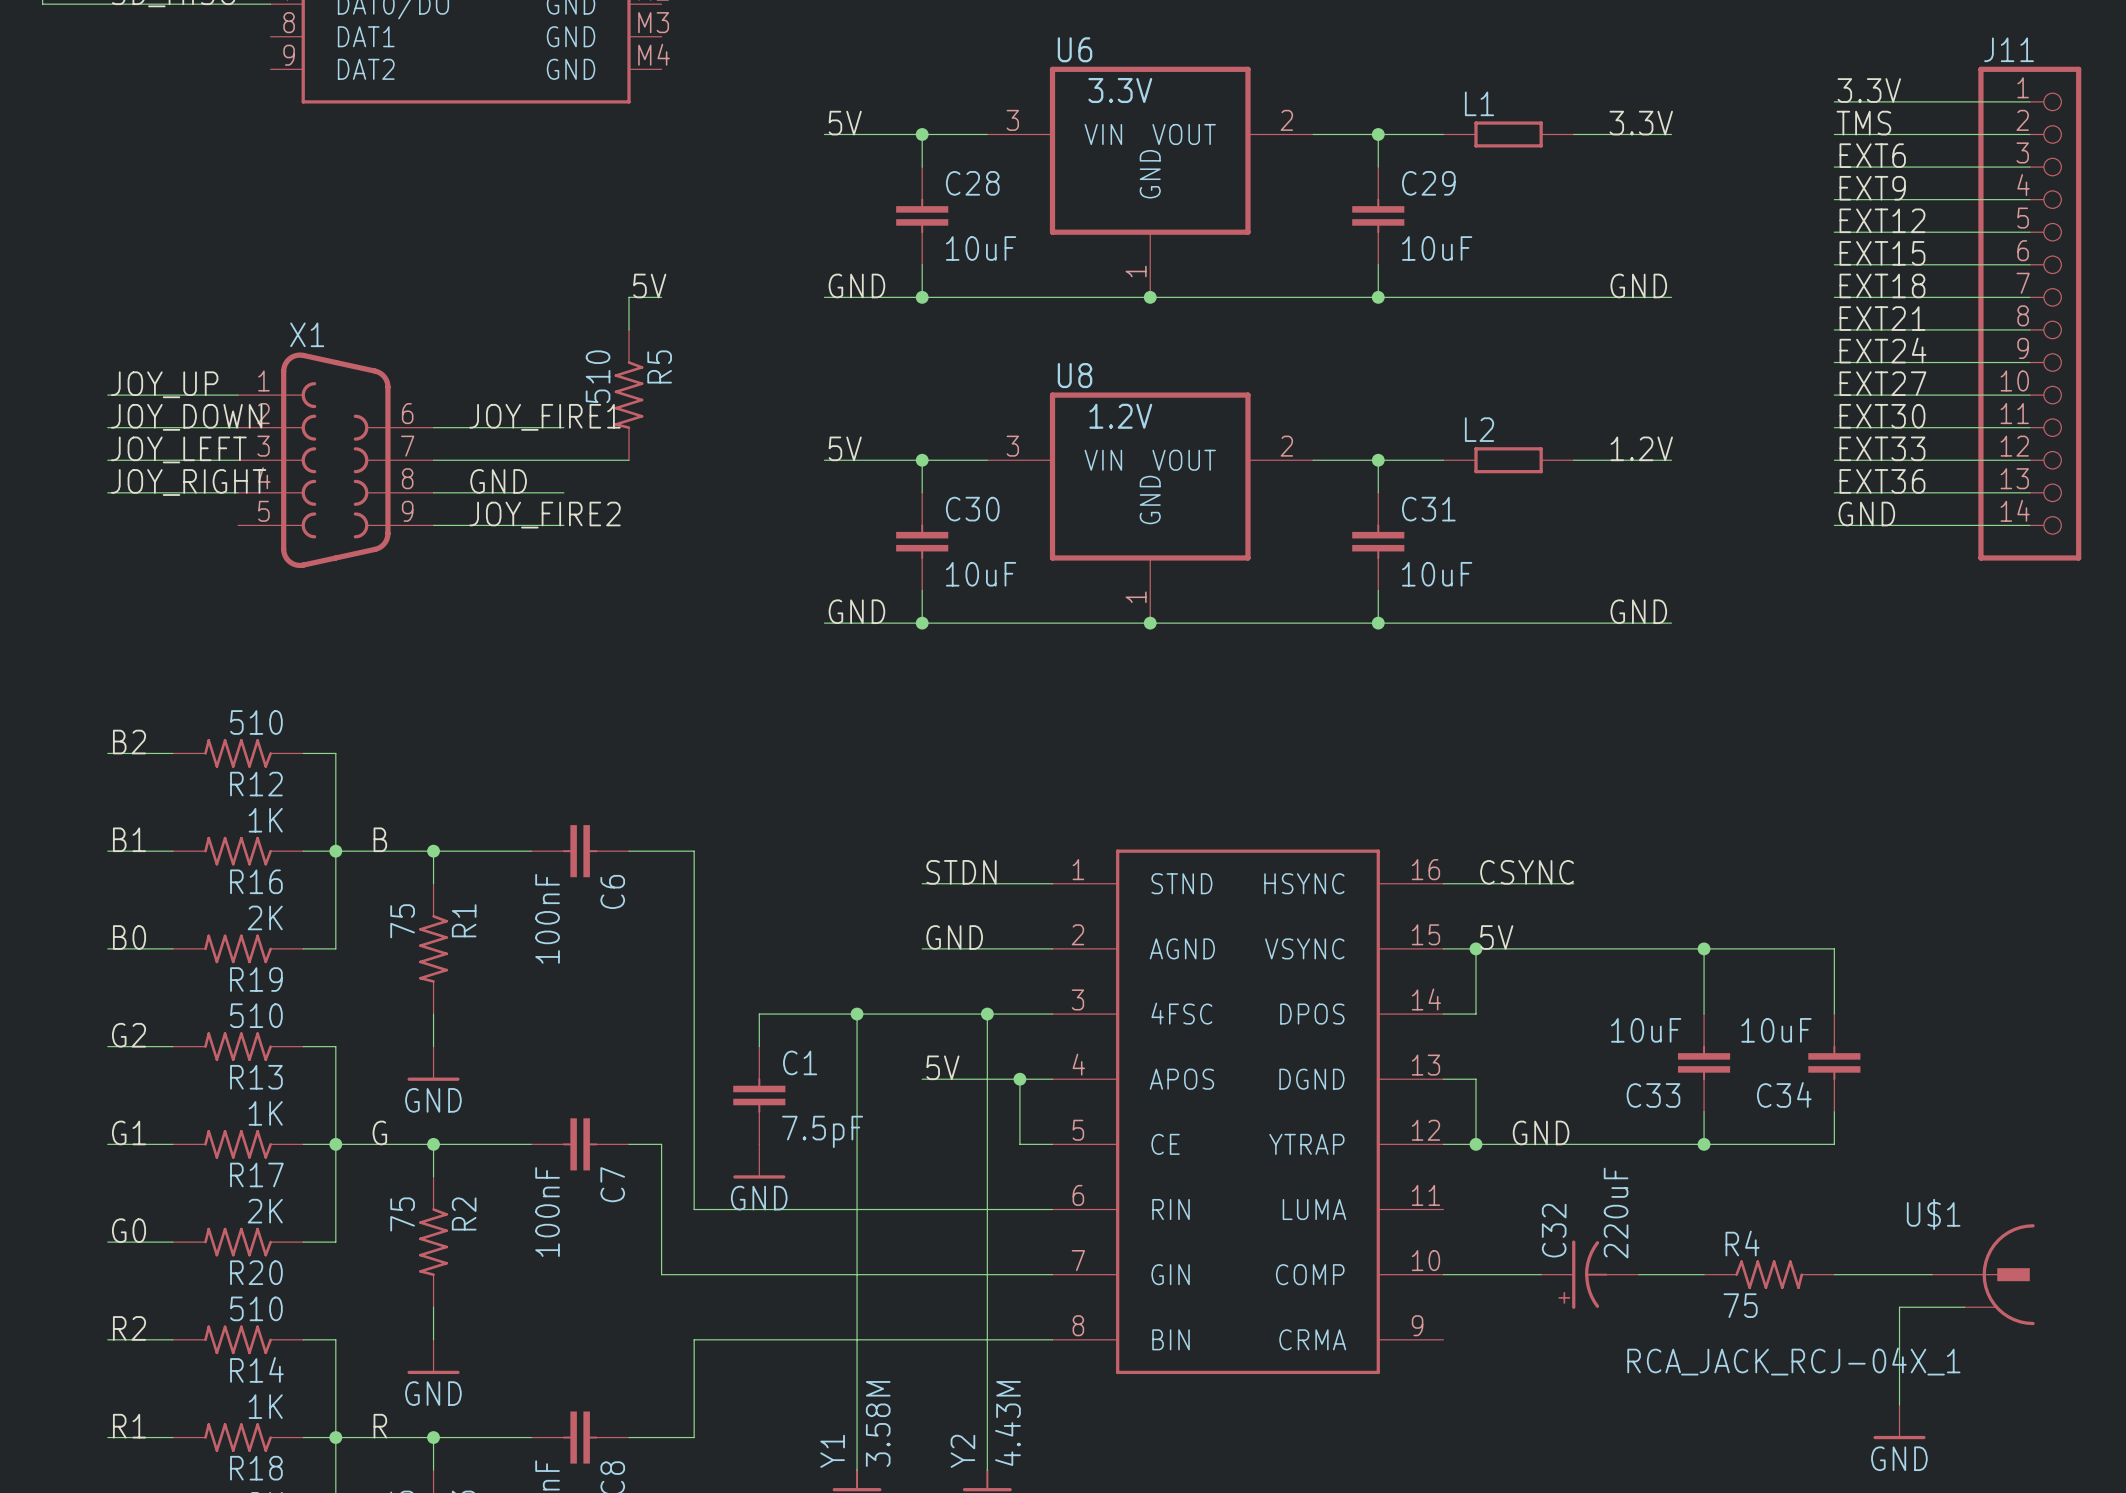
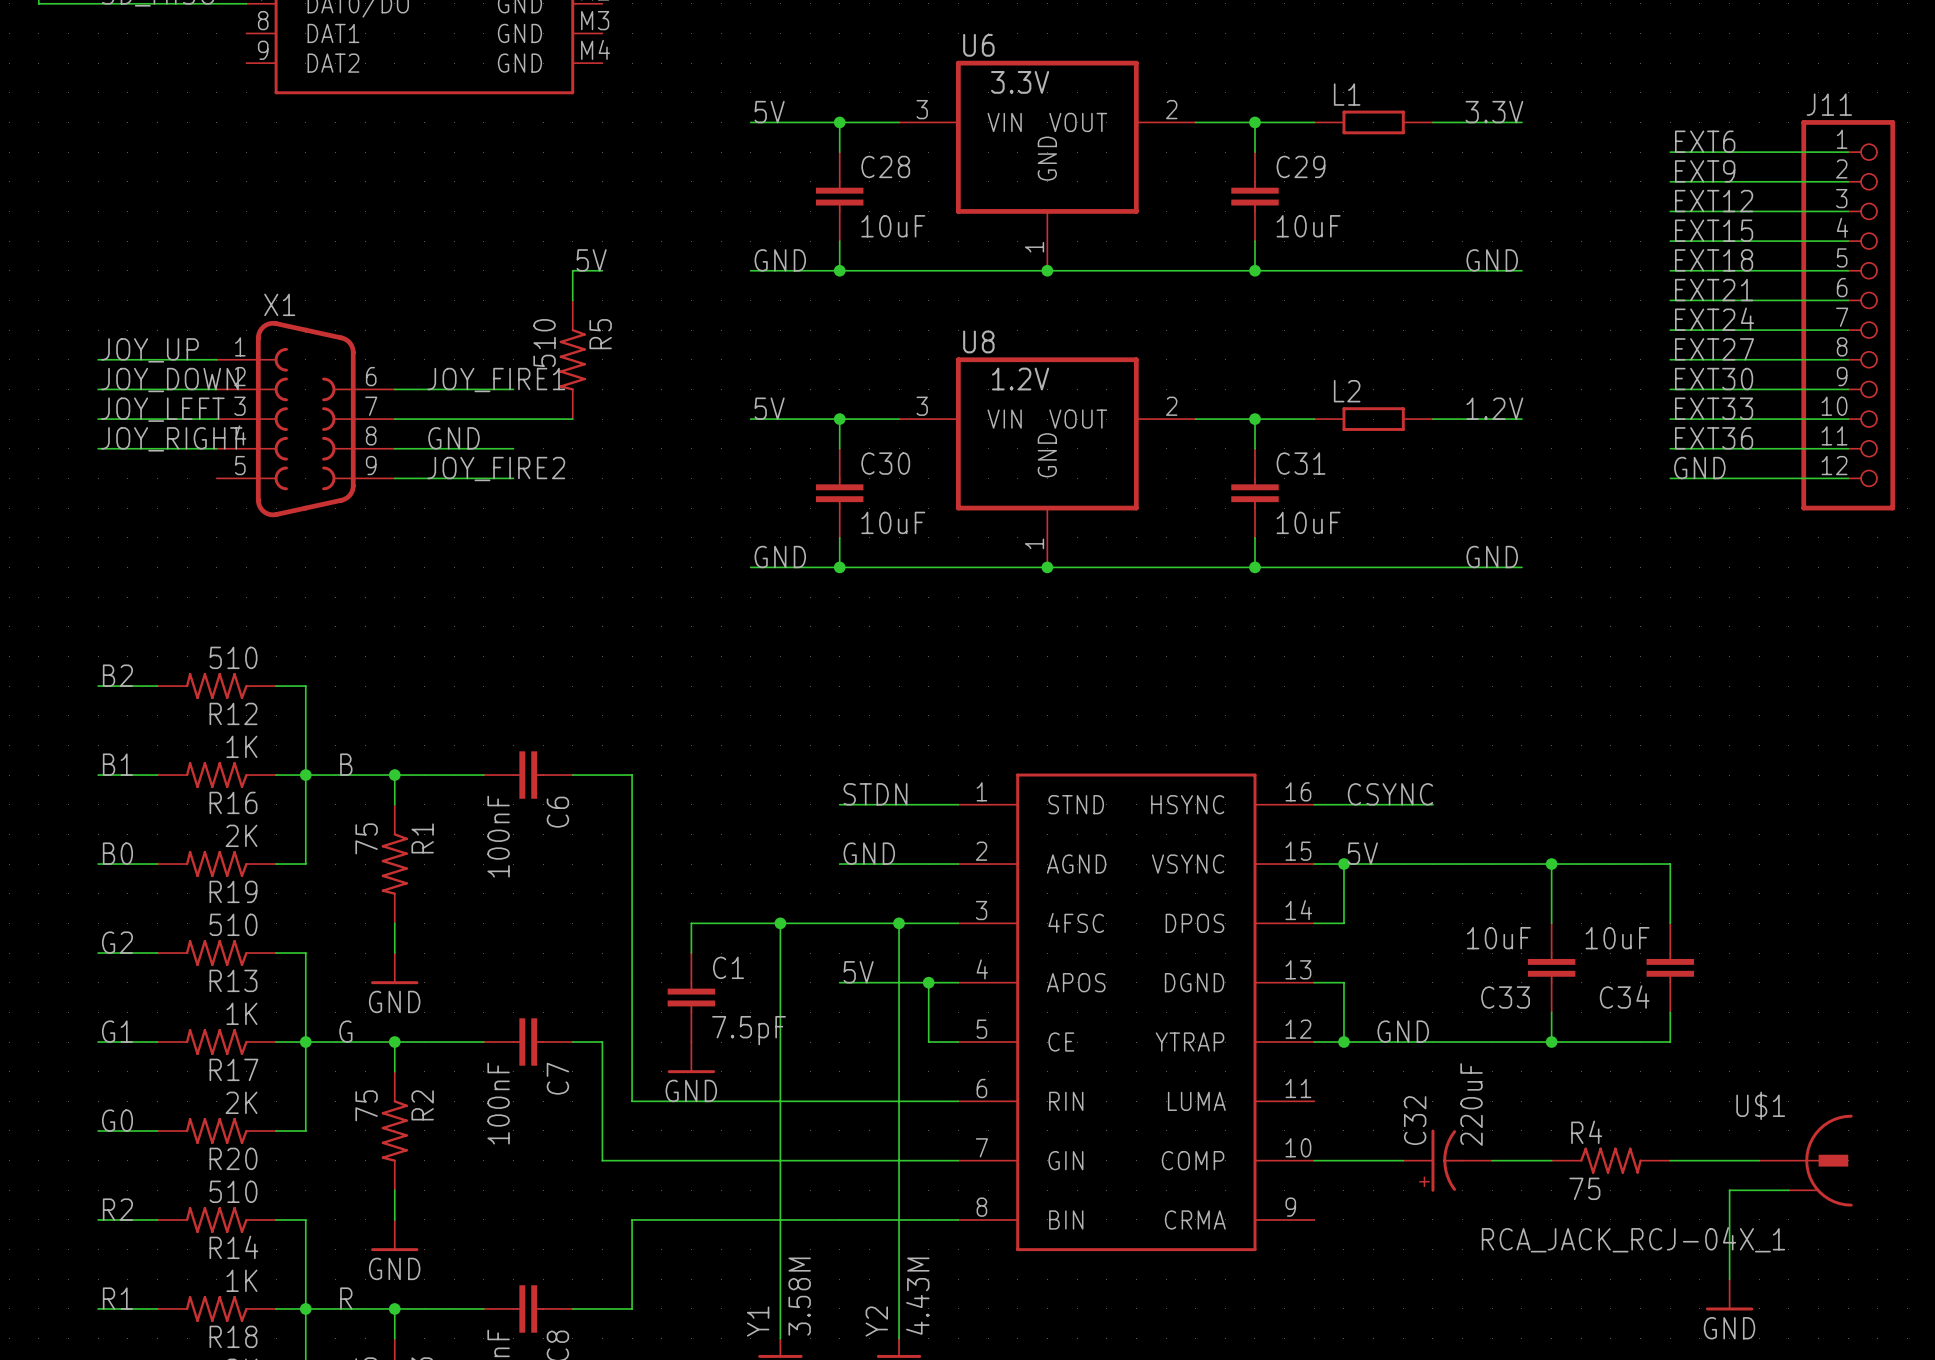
J11 name position: J11 (2009, 49) -> J11 (1829, 104)
J11 symbol: [1978, 66, 2082, 561] -> [1801, 120, 1896, 511]
label: 3.3V (1869, 90) -> none
wire: (1834, 101) (2029, 101) -> none
label: TMS (1863, 123) -> none
wire: (1834, 134) (2029, 134) -> none

